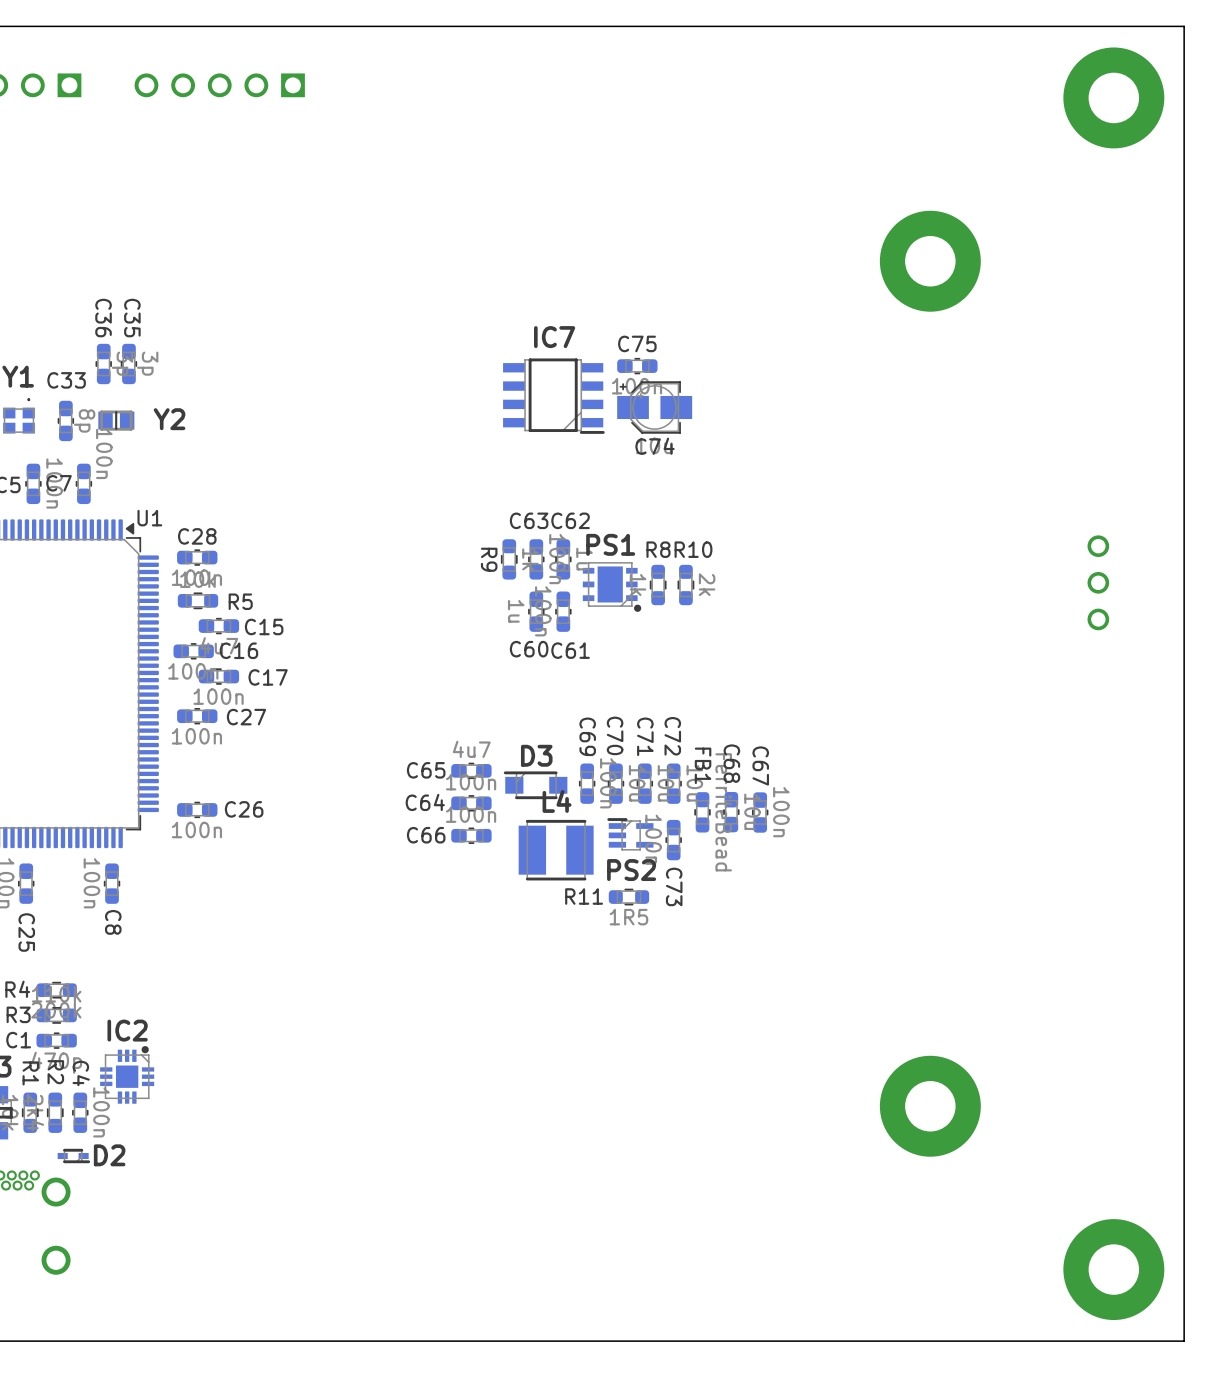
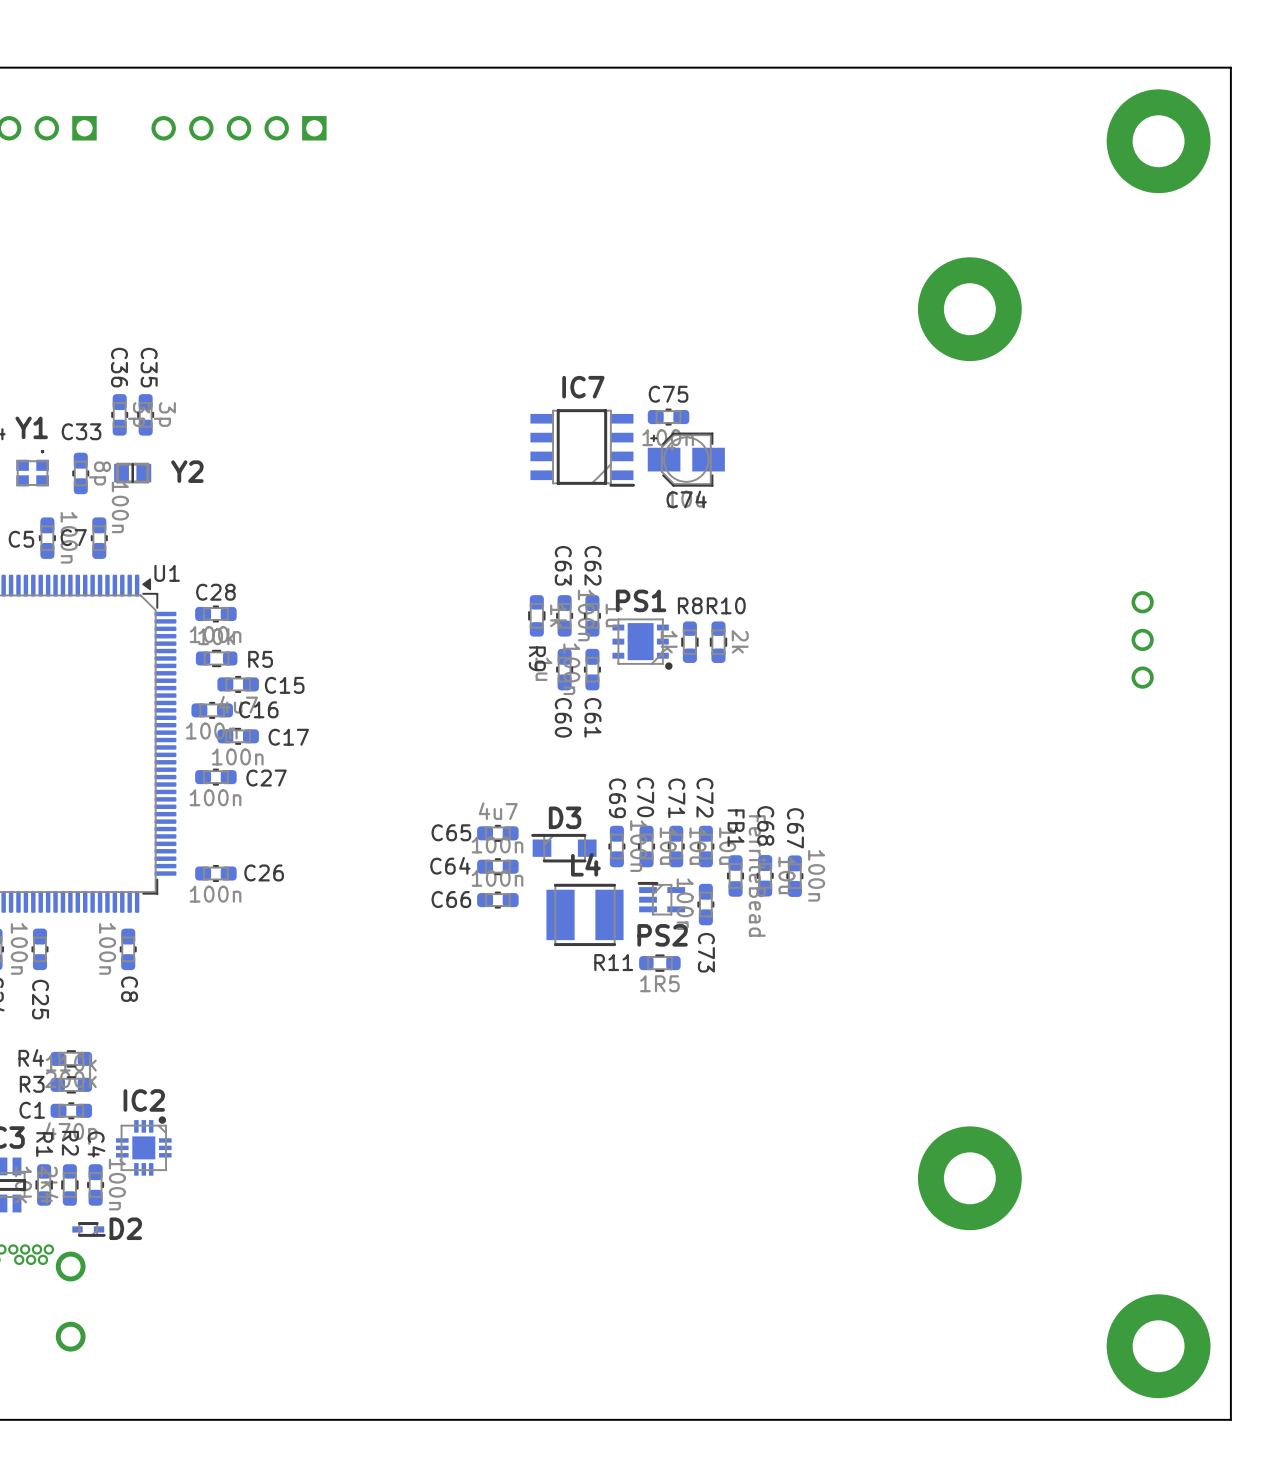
C63 name rotation: 0° (529, 520) -> 90° clockwise (563, 565)
C62 name rotation: 0° (570, 520) -> 90° clockwise (592, 565)
R9 name position: R9 (489, 559) -> R9 (537, 658)
C60 name rotation: 0° (529, 649) -> 90° clockwise (563, 717)
C61 name rotation: 0° (570, 650) -> 90° clockwise (592, 717)

